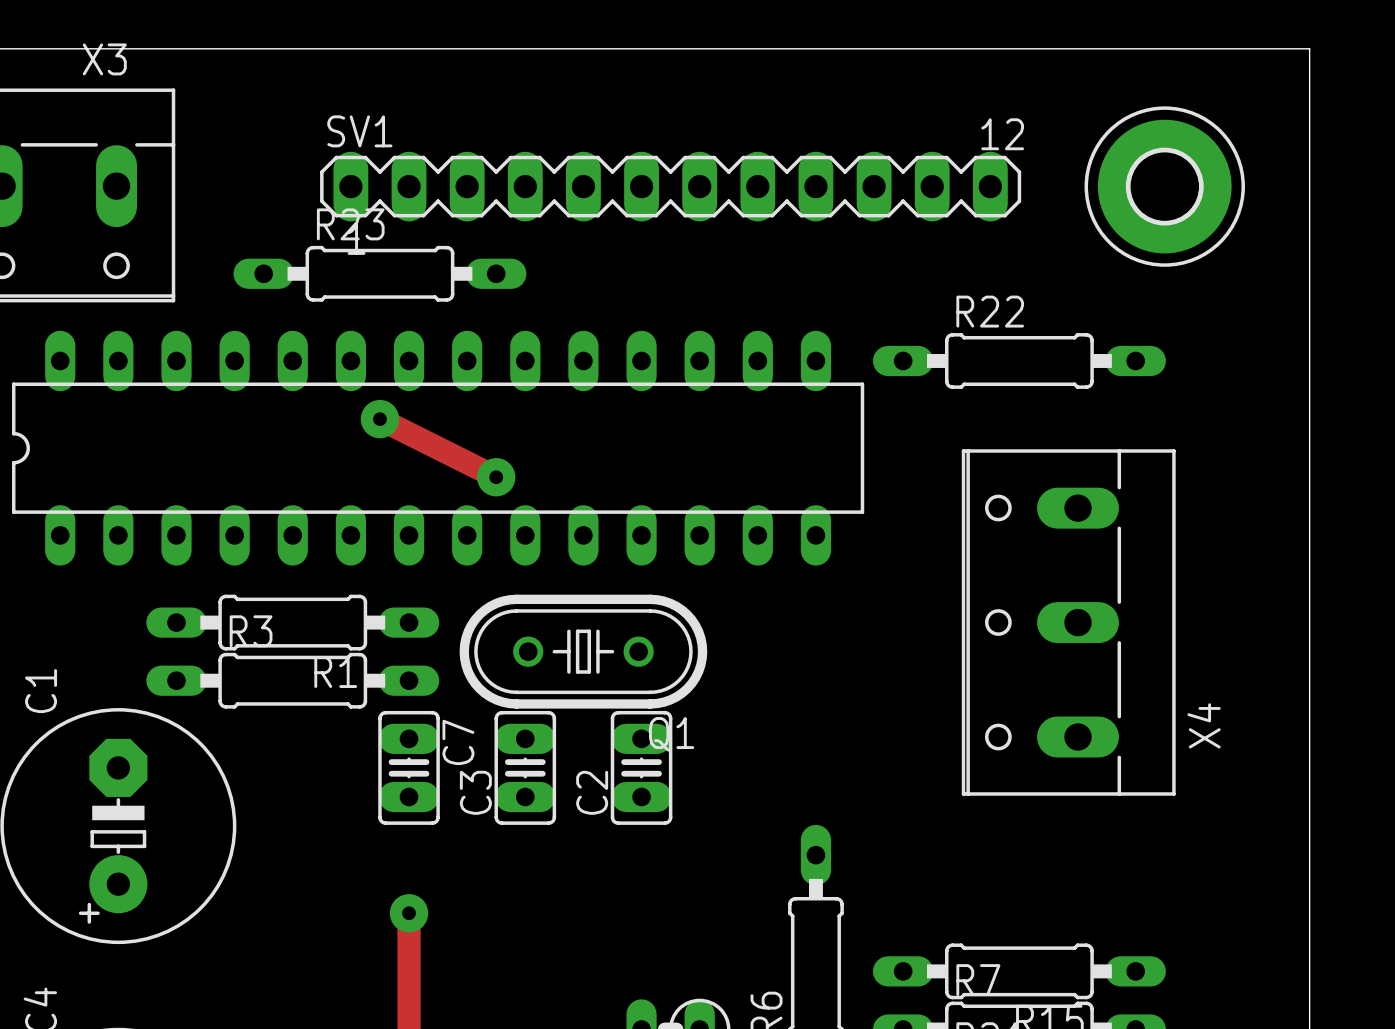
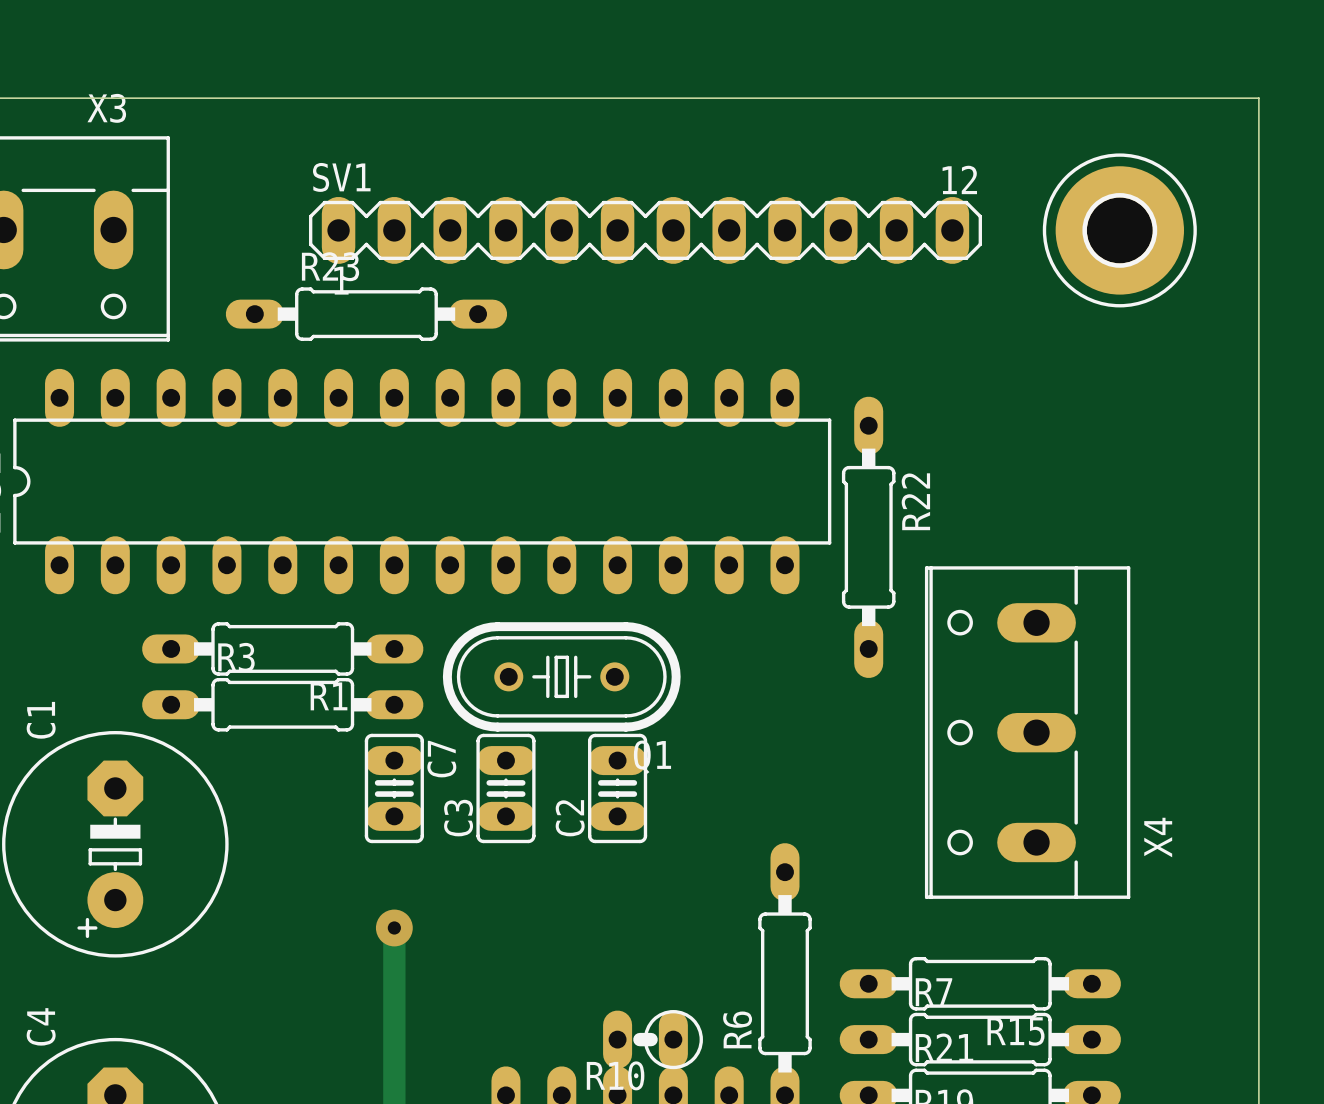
R22 rotation: 0° (1019, 360) -> 90° clockwise (868, 537)
R22 position: (1019, 360) -> (868, 537)
track: (379, 419) (496, 477) -> none
via: (379, 419) -> none
via: (496, 477) -> none
X4 position: (1068, 622) -> (1027, 732)

